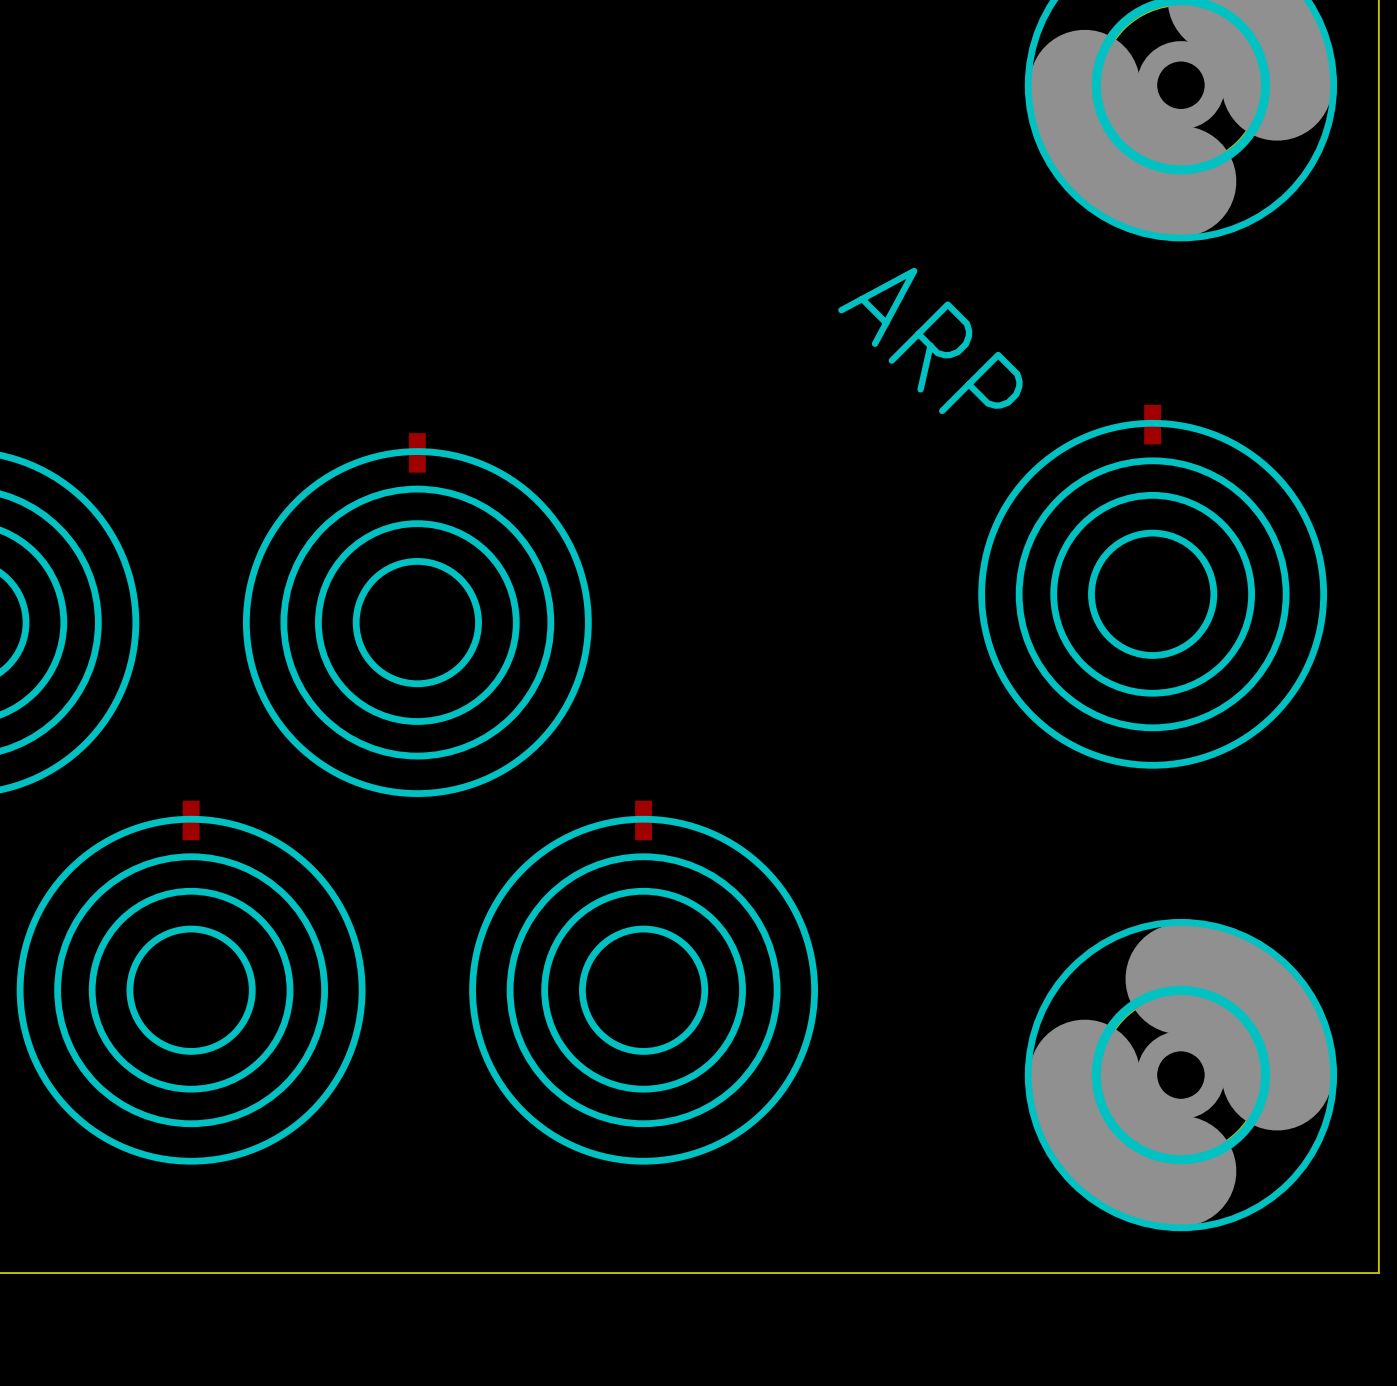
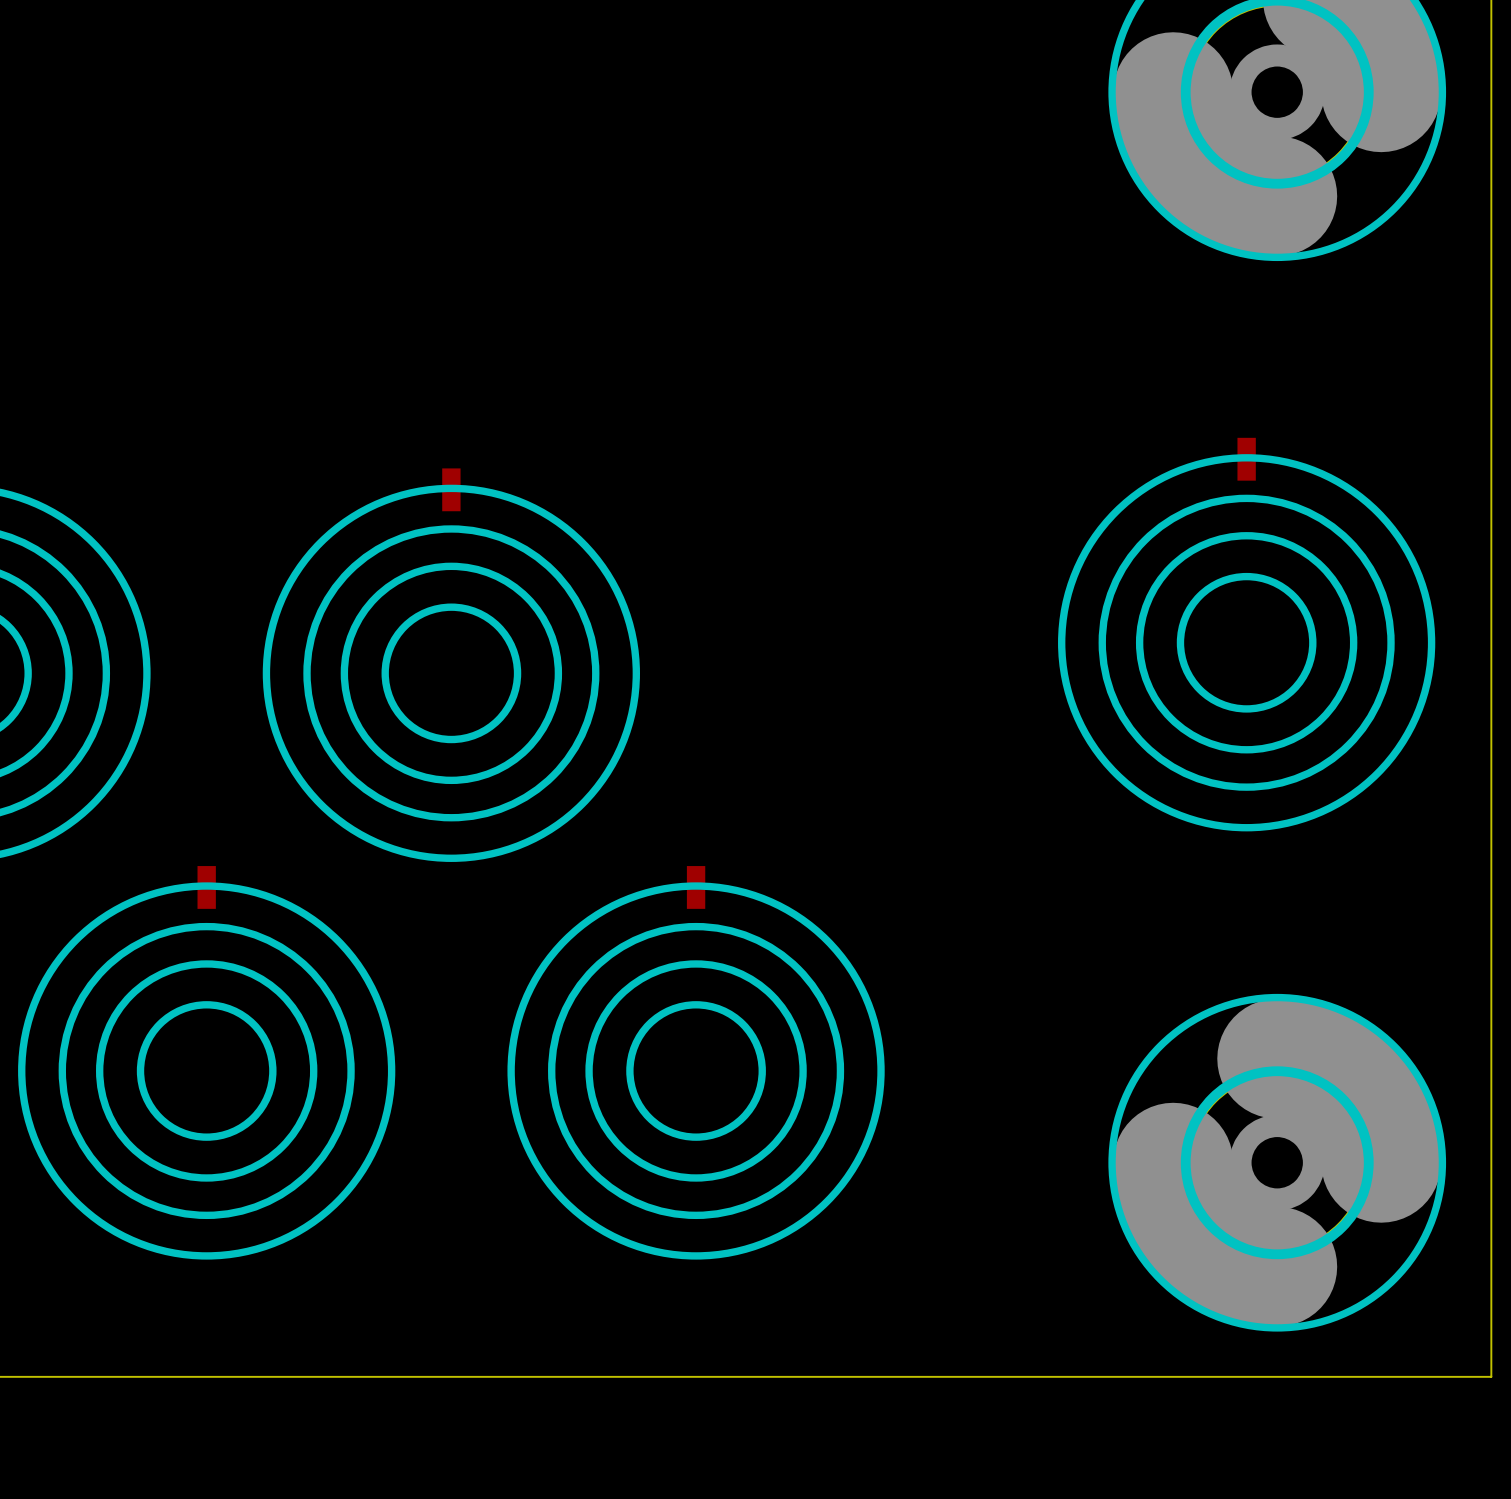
text: ARP (930, 340) -> none

